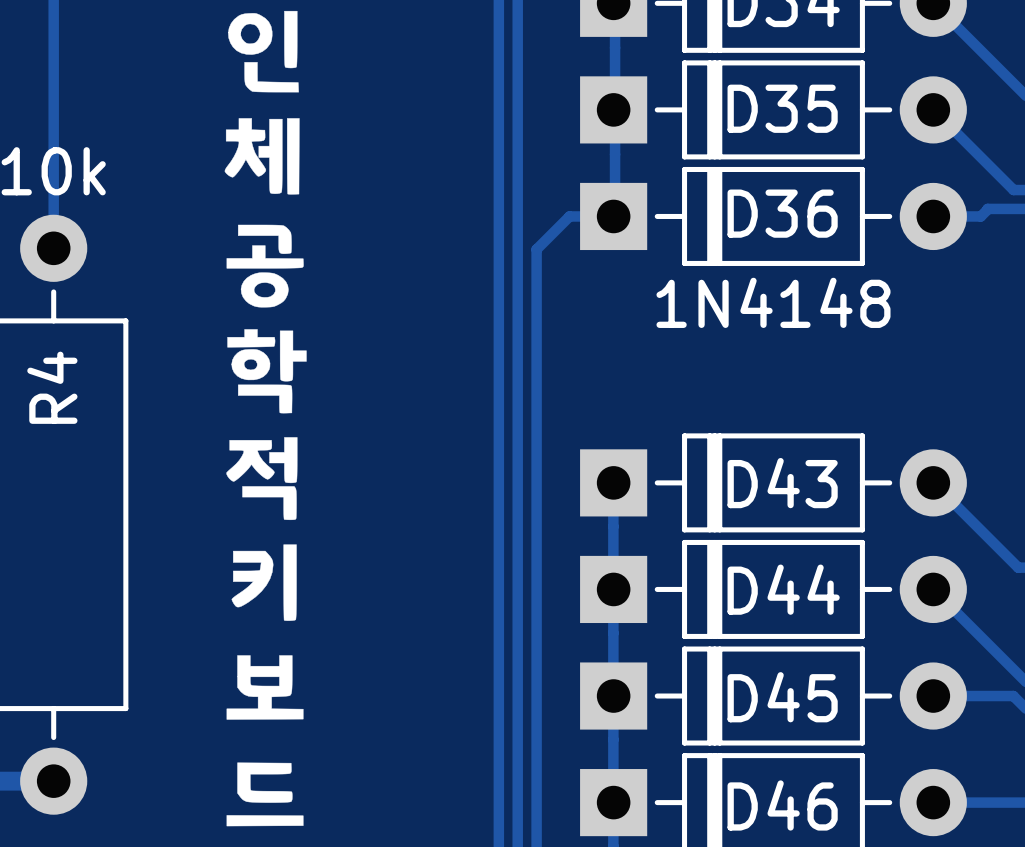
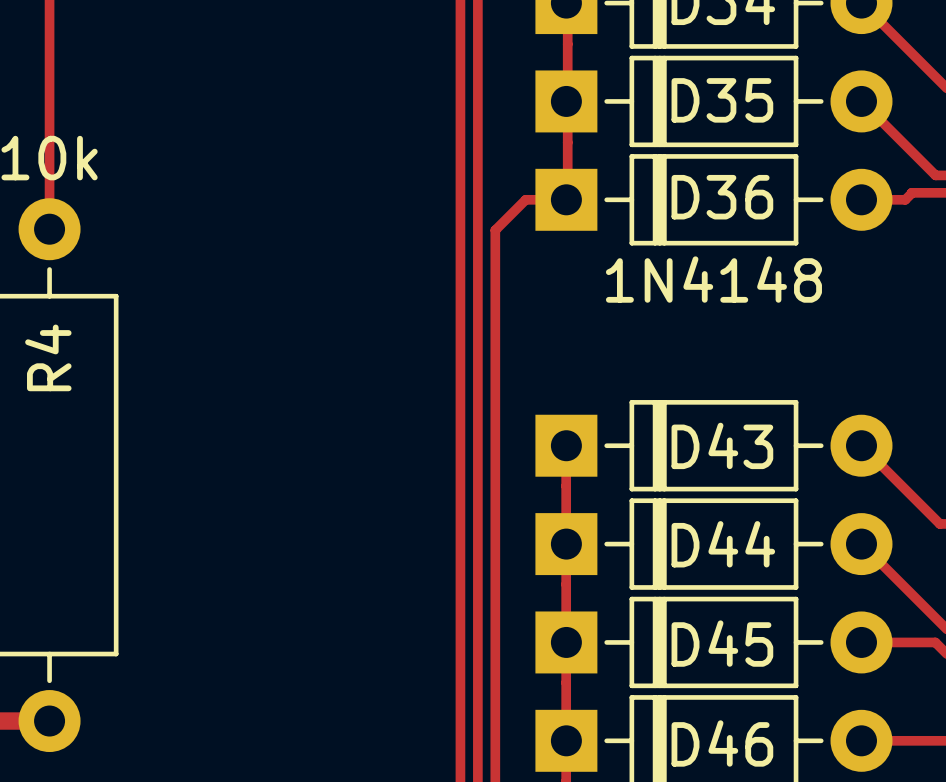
drawing: [224, 10, 307, 827] -> none

